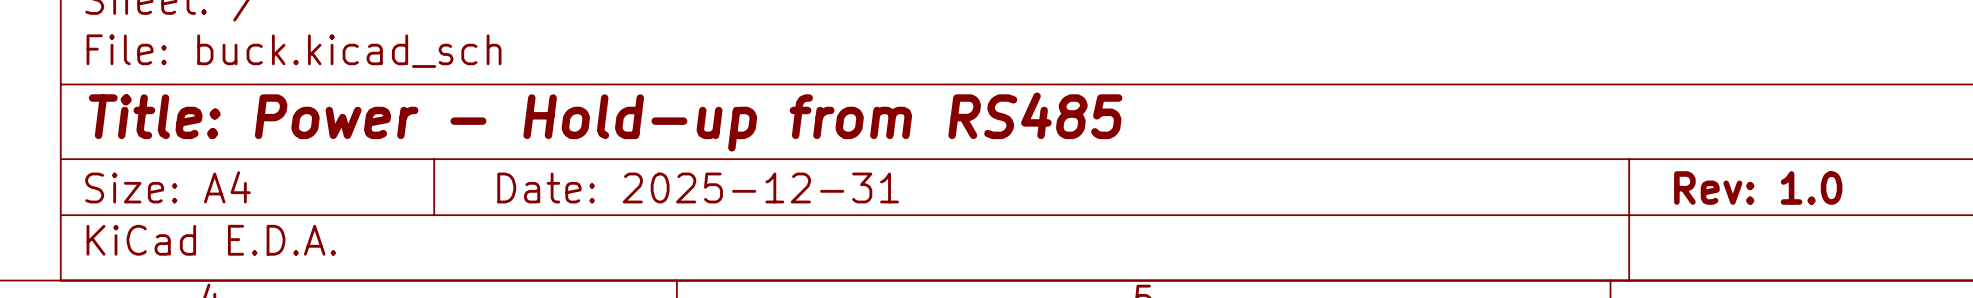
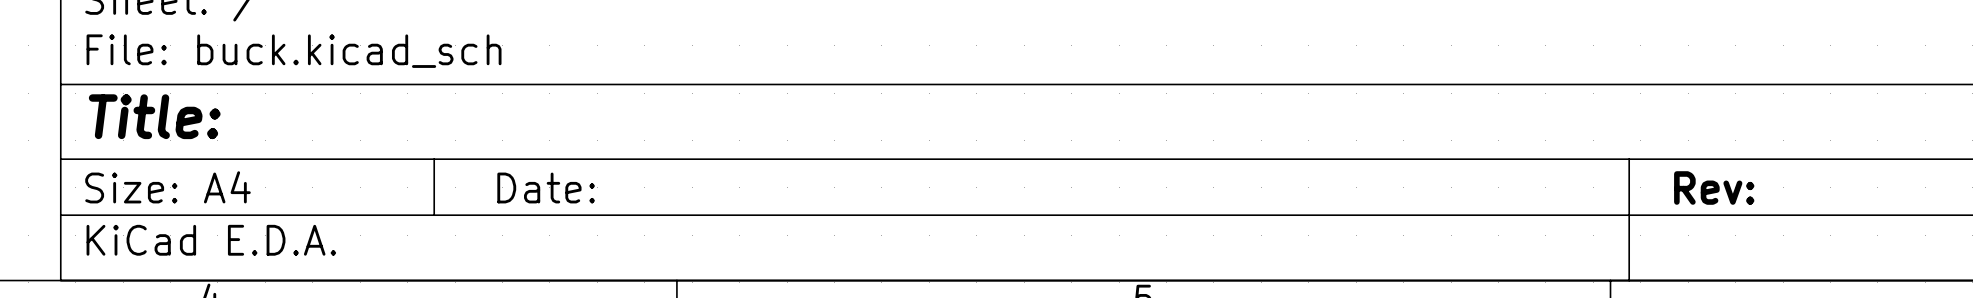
title block: Title: Power - Hold-up from RS485 (605, 122) -> Title: (154, 116)
title block: Date: 2025-12-31 (698, 187) -> Date: (546, 187)
title block: Rev: 1.0 (1758, 187) -> Rev: (1714, 187)

